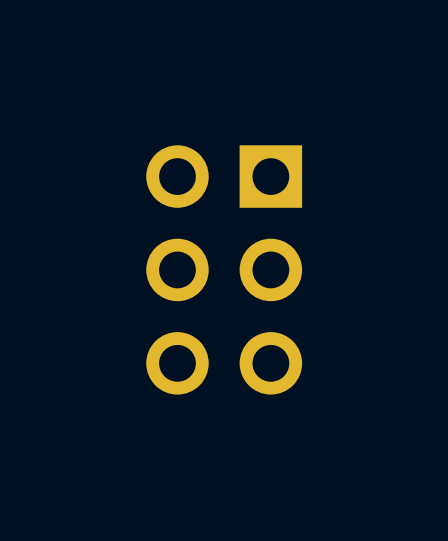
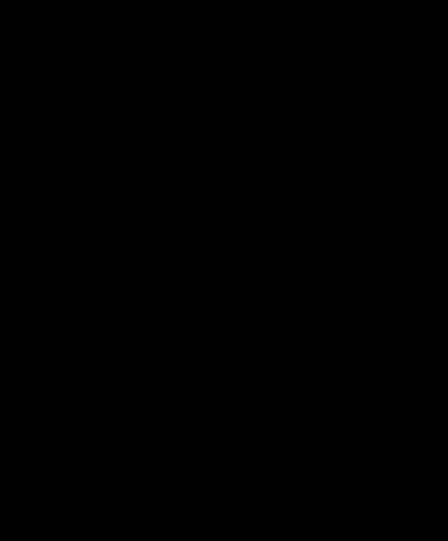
part: (224, 269) -> none

